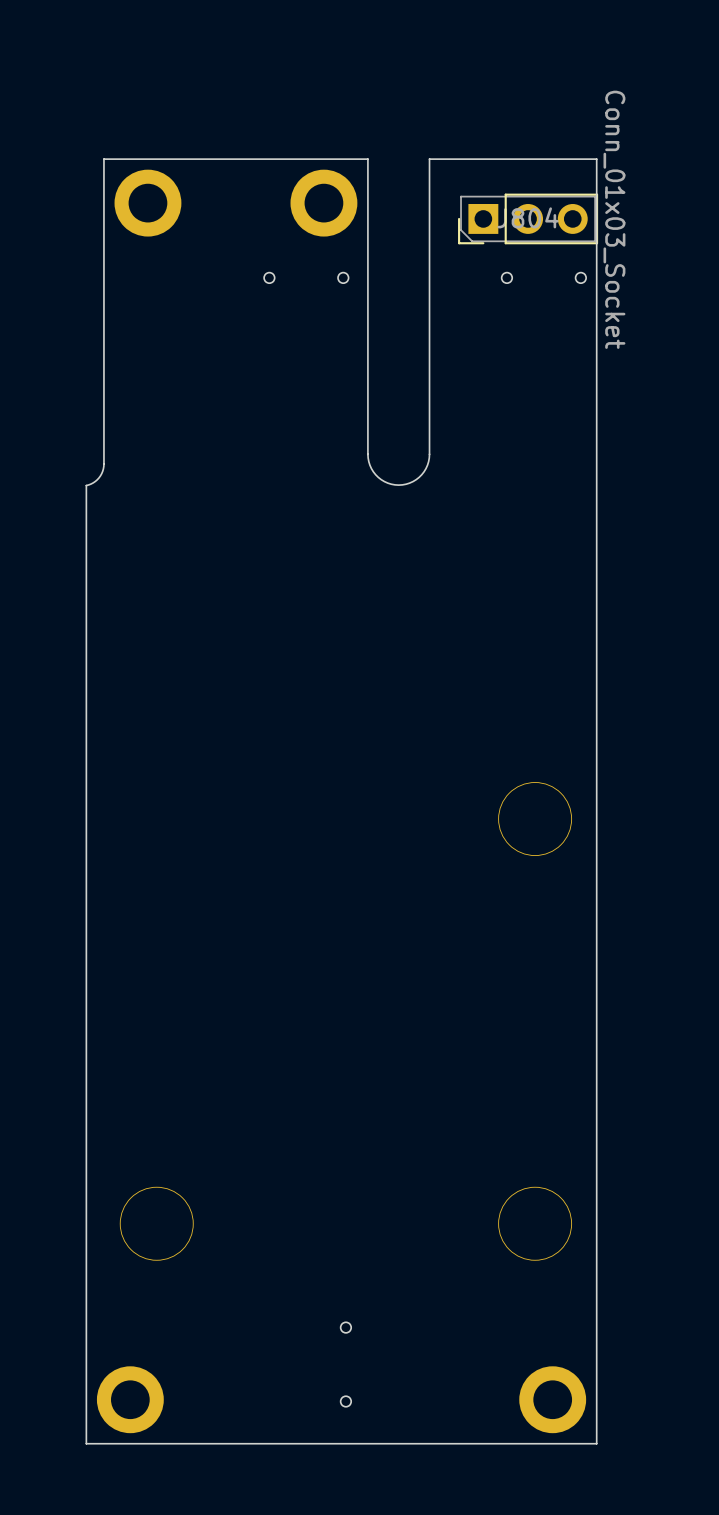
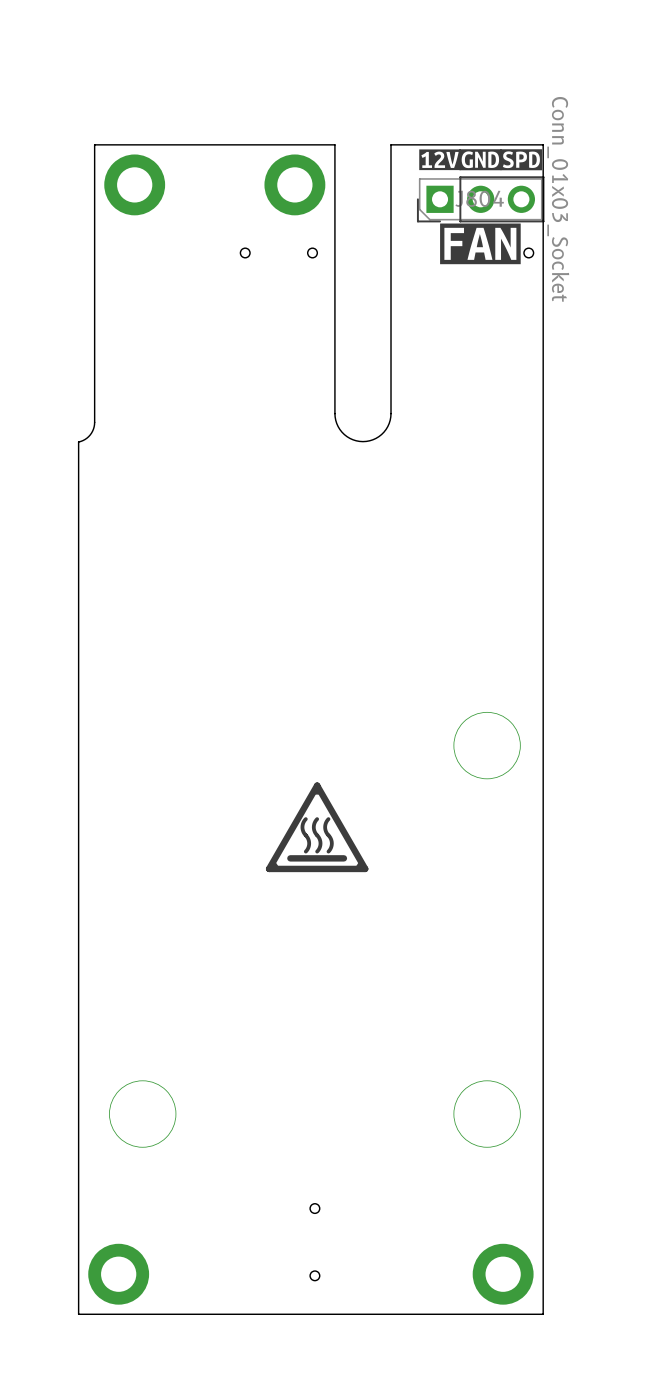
drawing: none -> [419, 149, 543, 171]
drawing: none -> [440, 223, 521, 265]
drawing: none -> [265, 782, 369, 873]

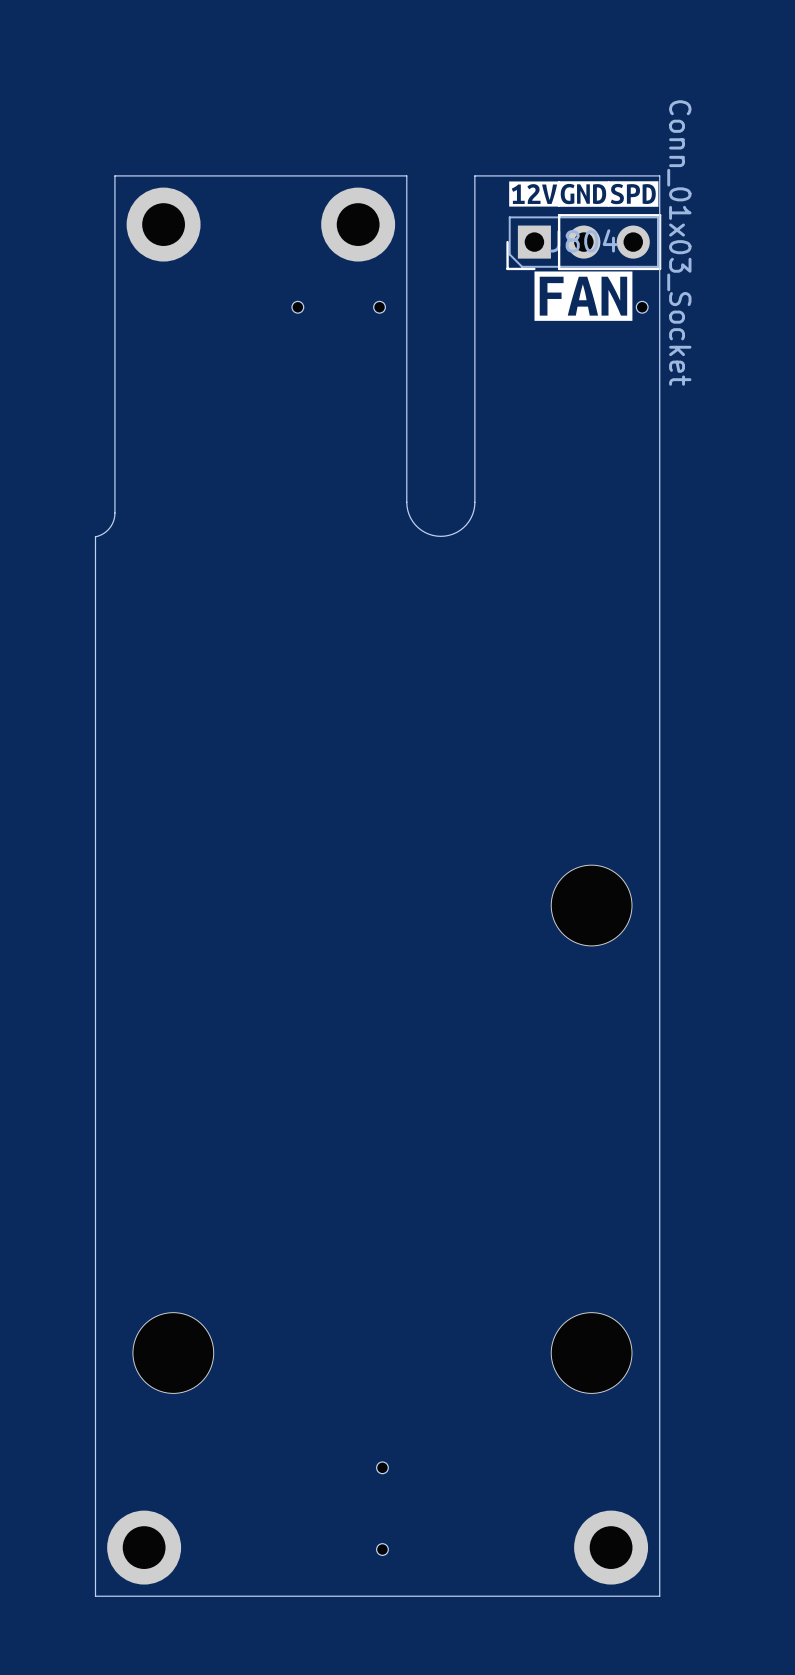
drawing: [265, 782, 369, 873] -> none

